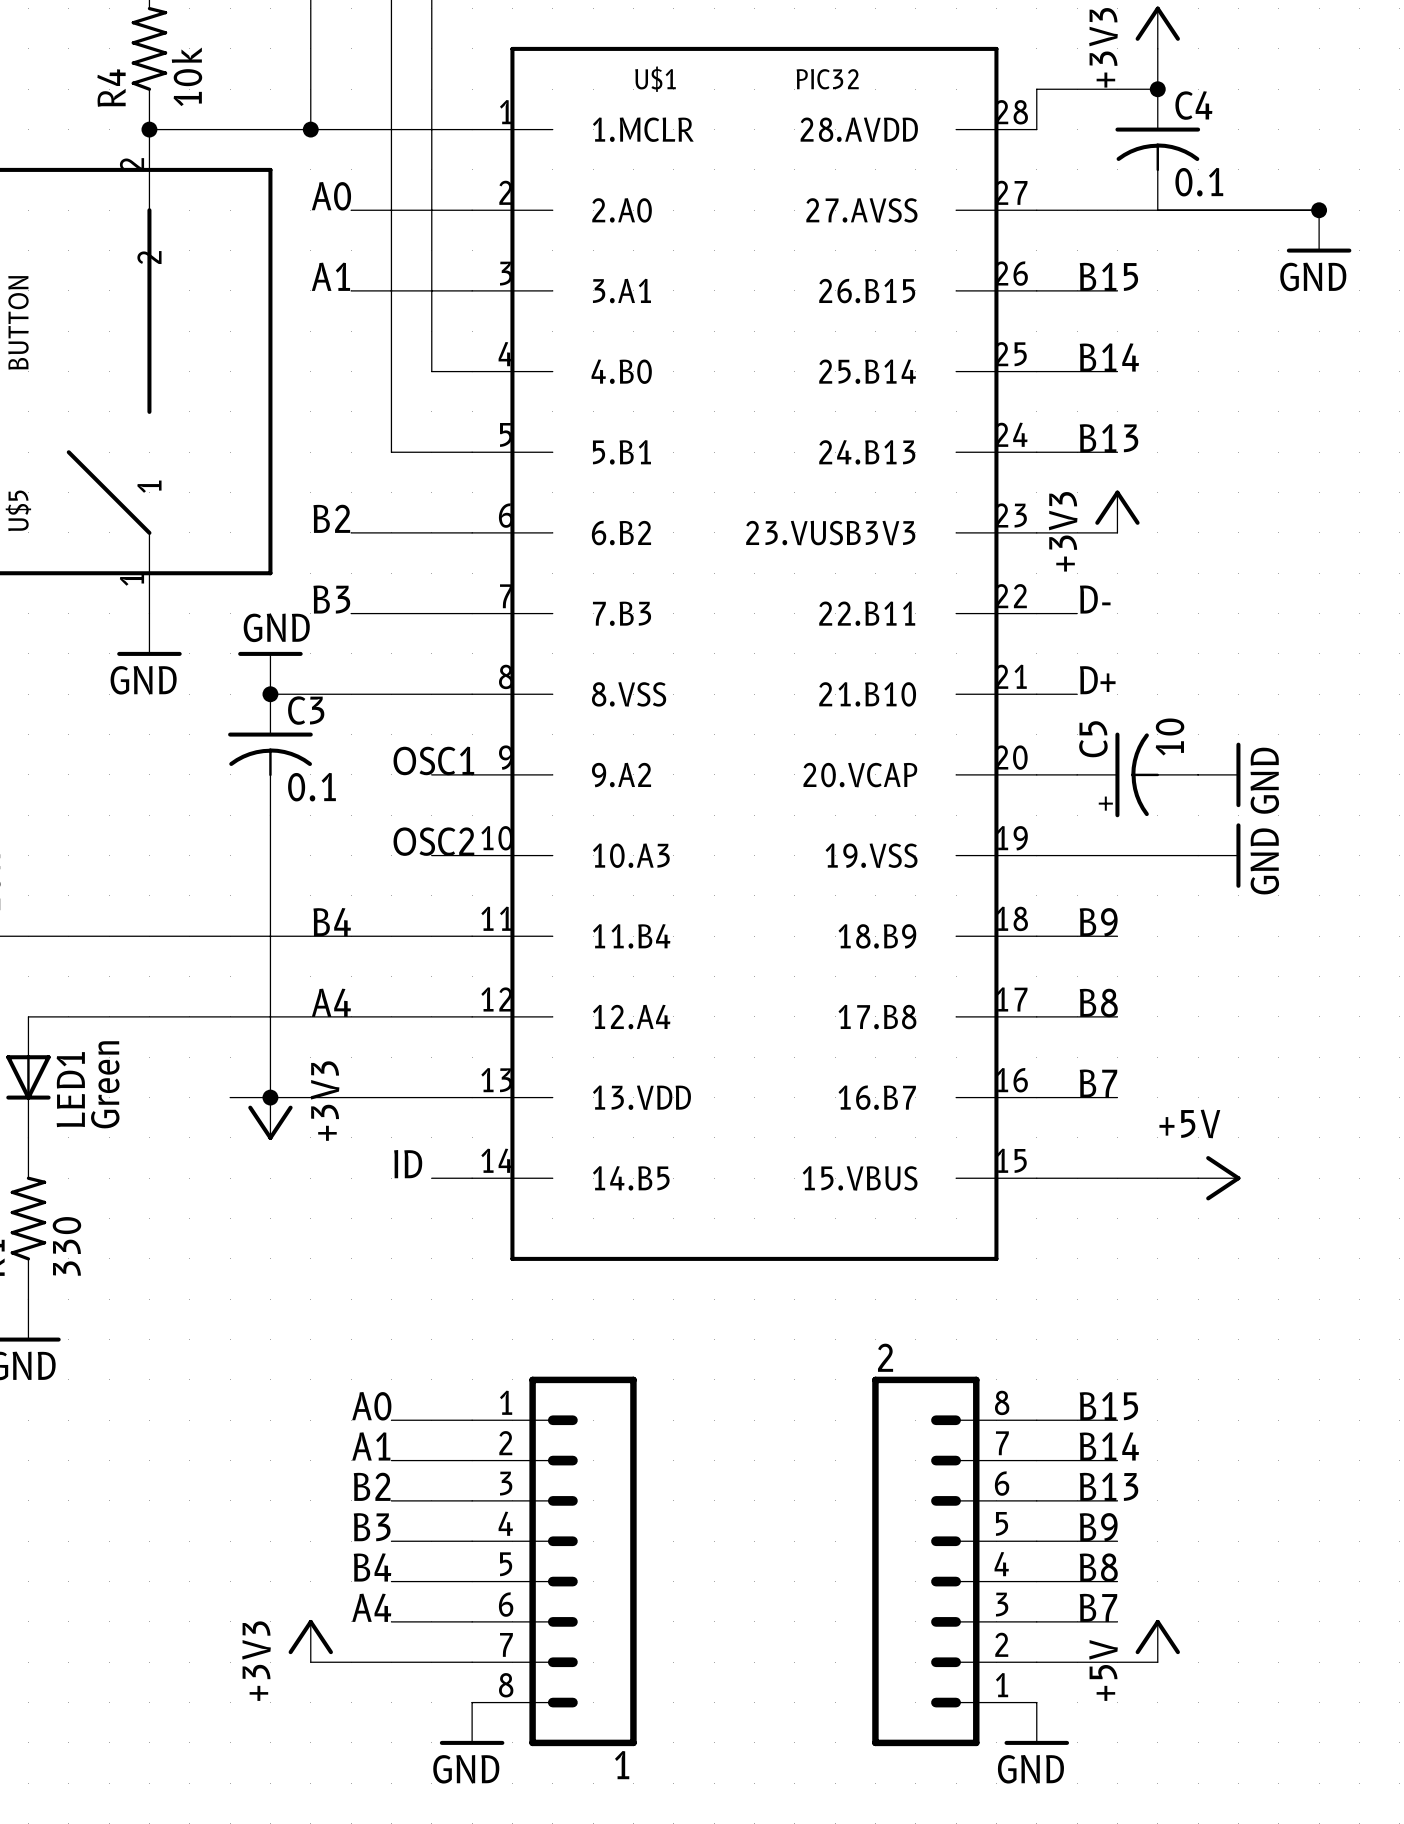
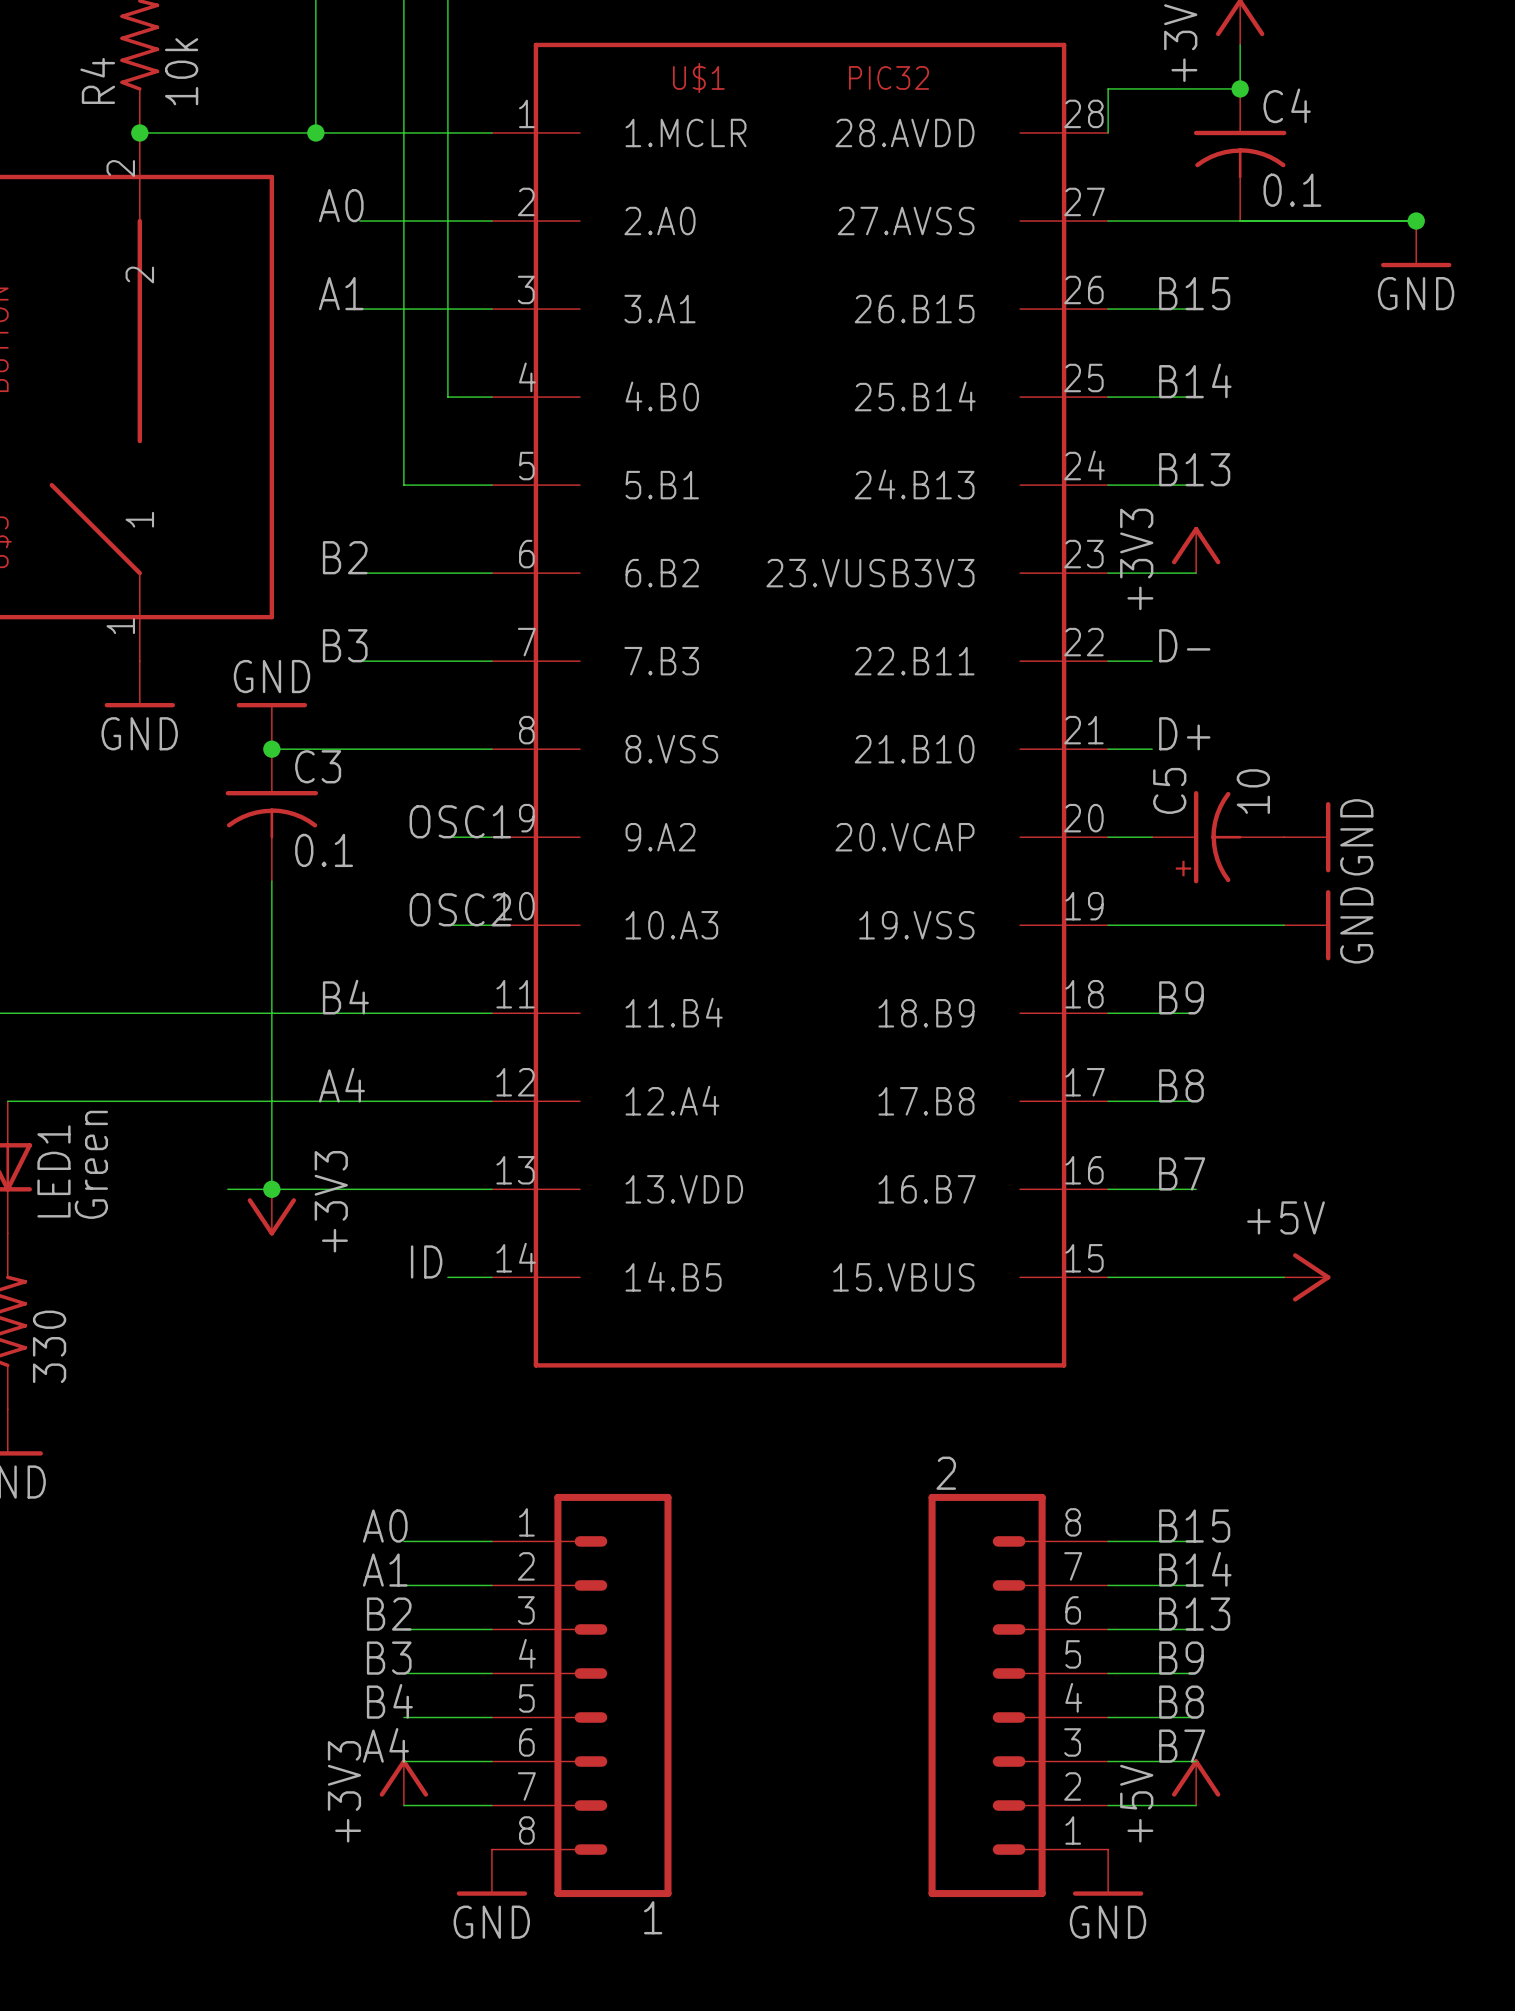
power symbol position: +3V3 (310, 1641) -> +3V3 (403, 1782)
power symbol position: +5V (1157, 1641) -> +5V (1196, 1782)
wire: (310, 1662) (391, 1662) -> none
wire: (1117, 1662) (1157, 1662) -> none

